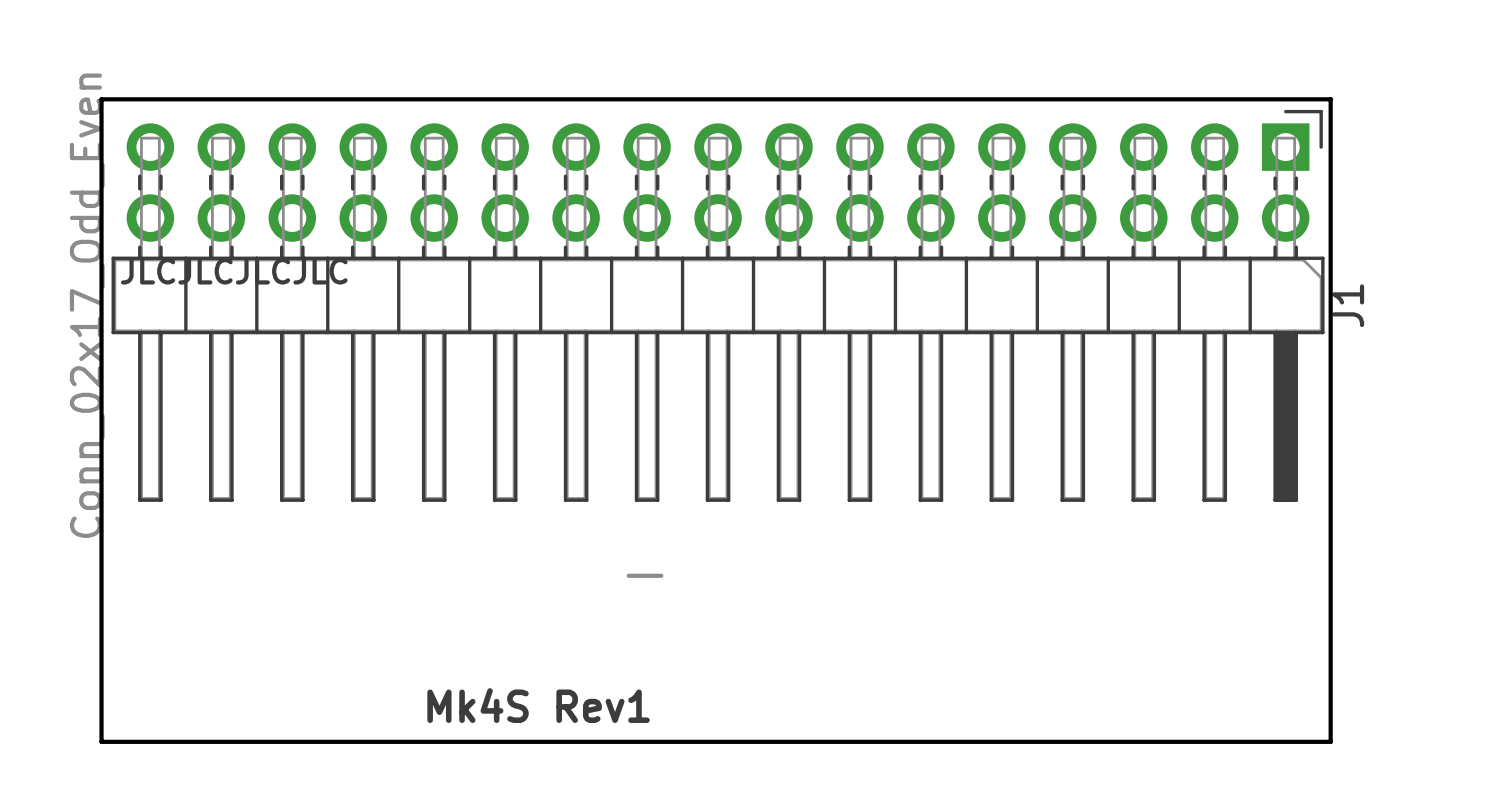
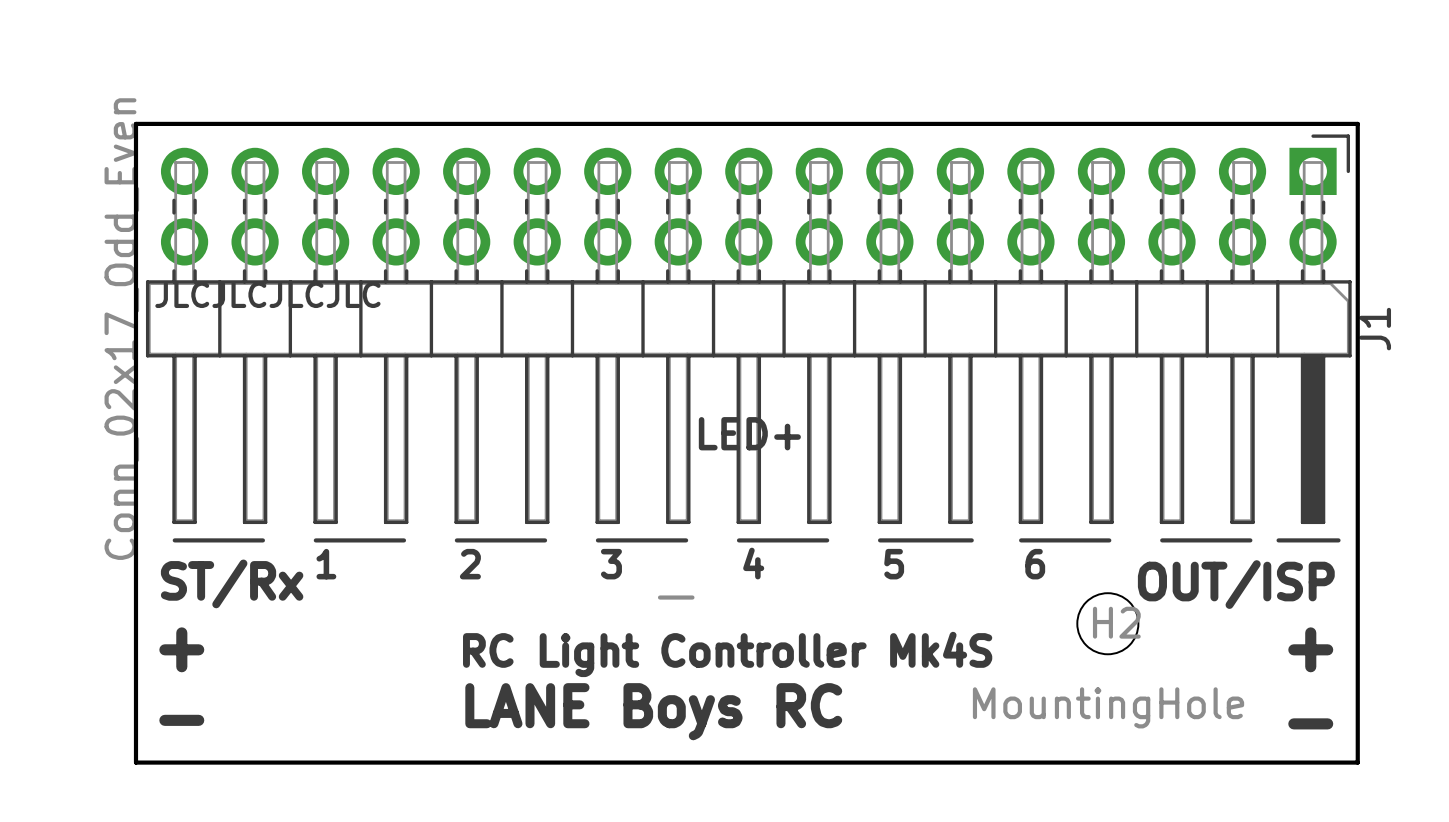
text: none -> LED+ (749, 433)
line: none -> (174, 540) (262, 540)
line: none -> (315, 540) (403, 540)
line: none -> (456, 540) (545, 540)
line: none -> (597, 540) (686, 540)
line: none -> (739, 540) (827, 540)
line: none -> (880, 540) (971, 540)
line: none -> (1021, 540) (1109, 540)
line: none -> (1162, 540) (1250, 540)
line: none -> (1278, 540) (1338, 540)
text: none -> 4 (753, 563)
text: none -> 1 (326, 564)
text: none -> 2 (470, 564)
text: none -> 3 (611, 564)
text: none -> 5 (894, 564)
text: none -> 6 (1035, 564)
text: none -> ST/Rx (232, 583)
text: none -> OUT/ISP (1236, 584)
H2: none -> MountingHole (1107, 623)
text: none -> + (181, 649)
text: none -> + (1310, 649)
text: none -> RC Light Controller Mk4S (727, 654)
text: none -> LANE Boys RC (653, 711)
text: none -> - (181, 720)
text: none -> - (1310, 723)
text: Mk4S Rev1 (538, 705) -> none

